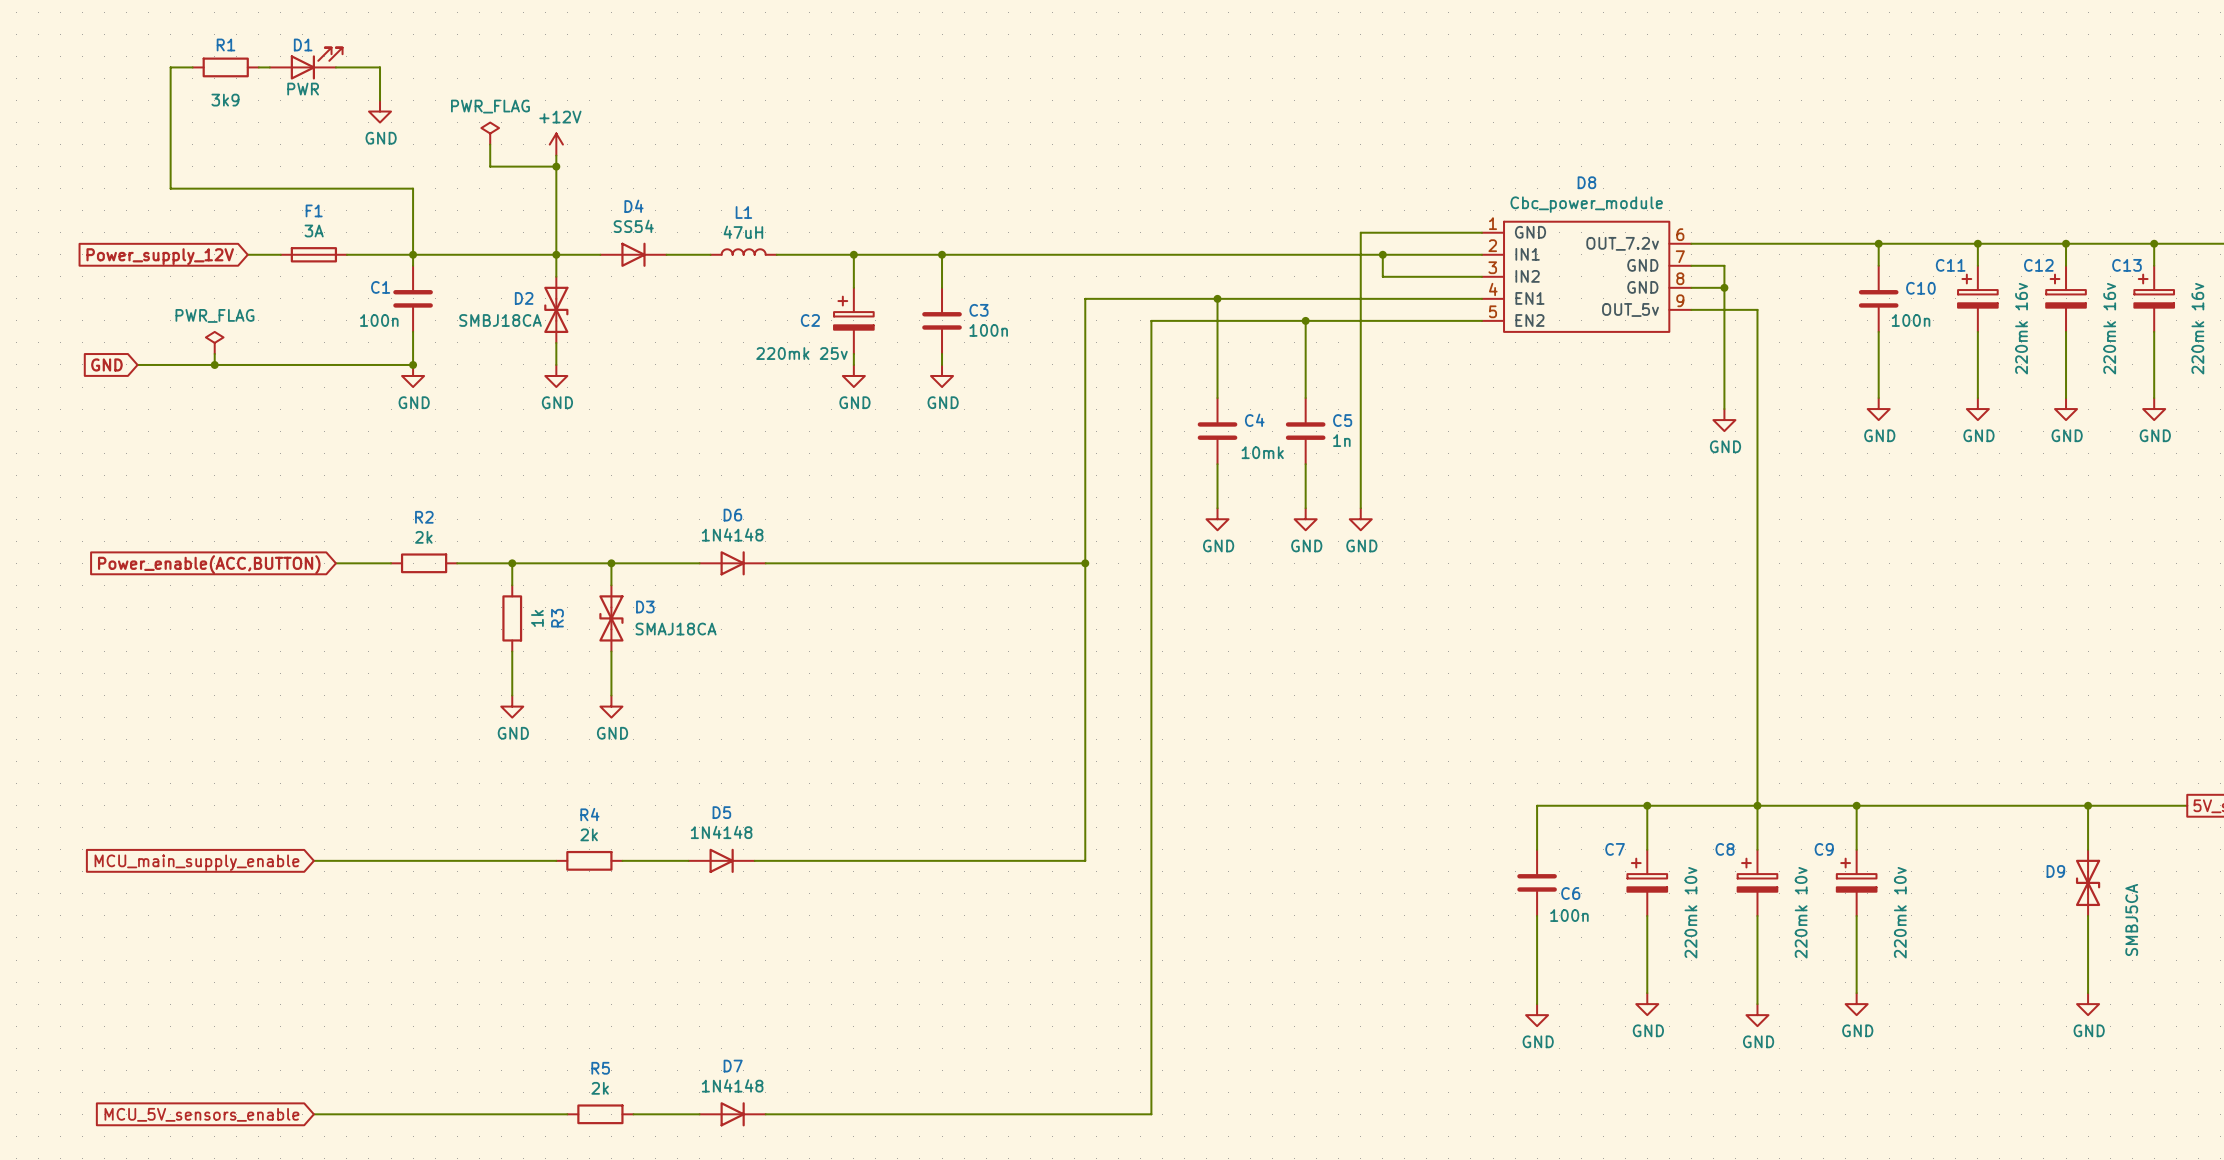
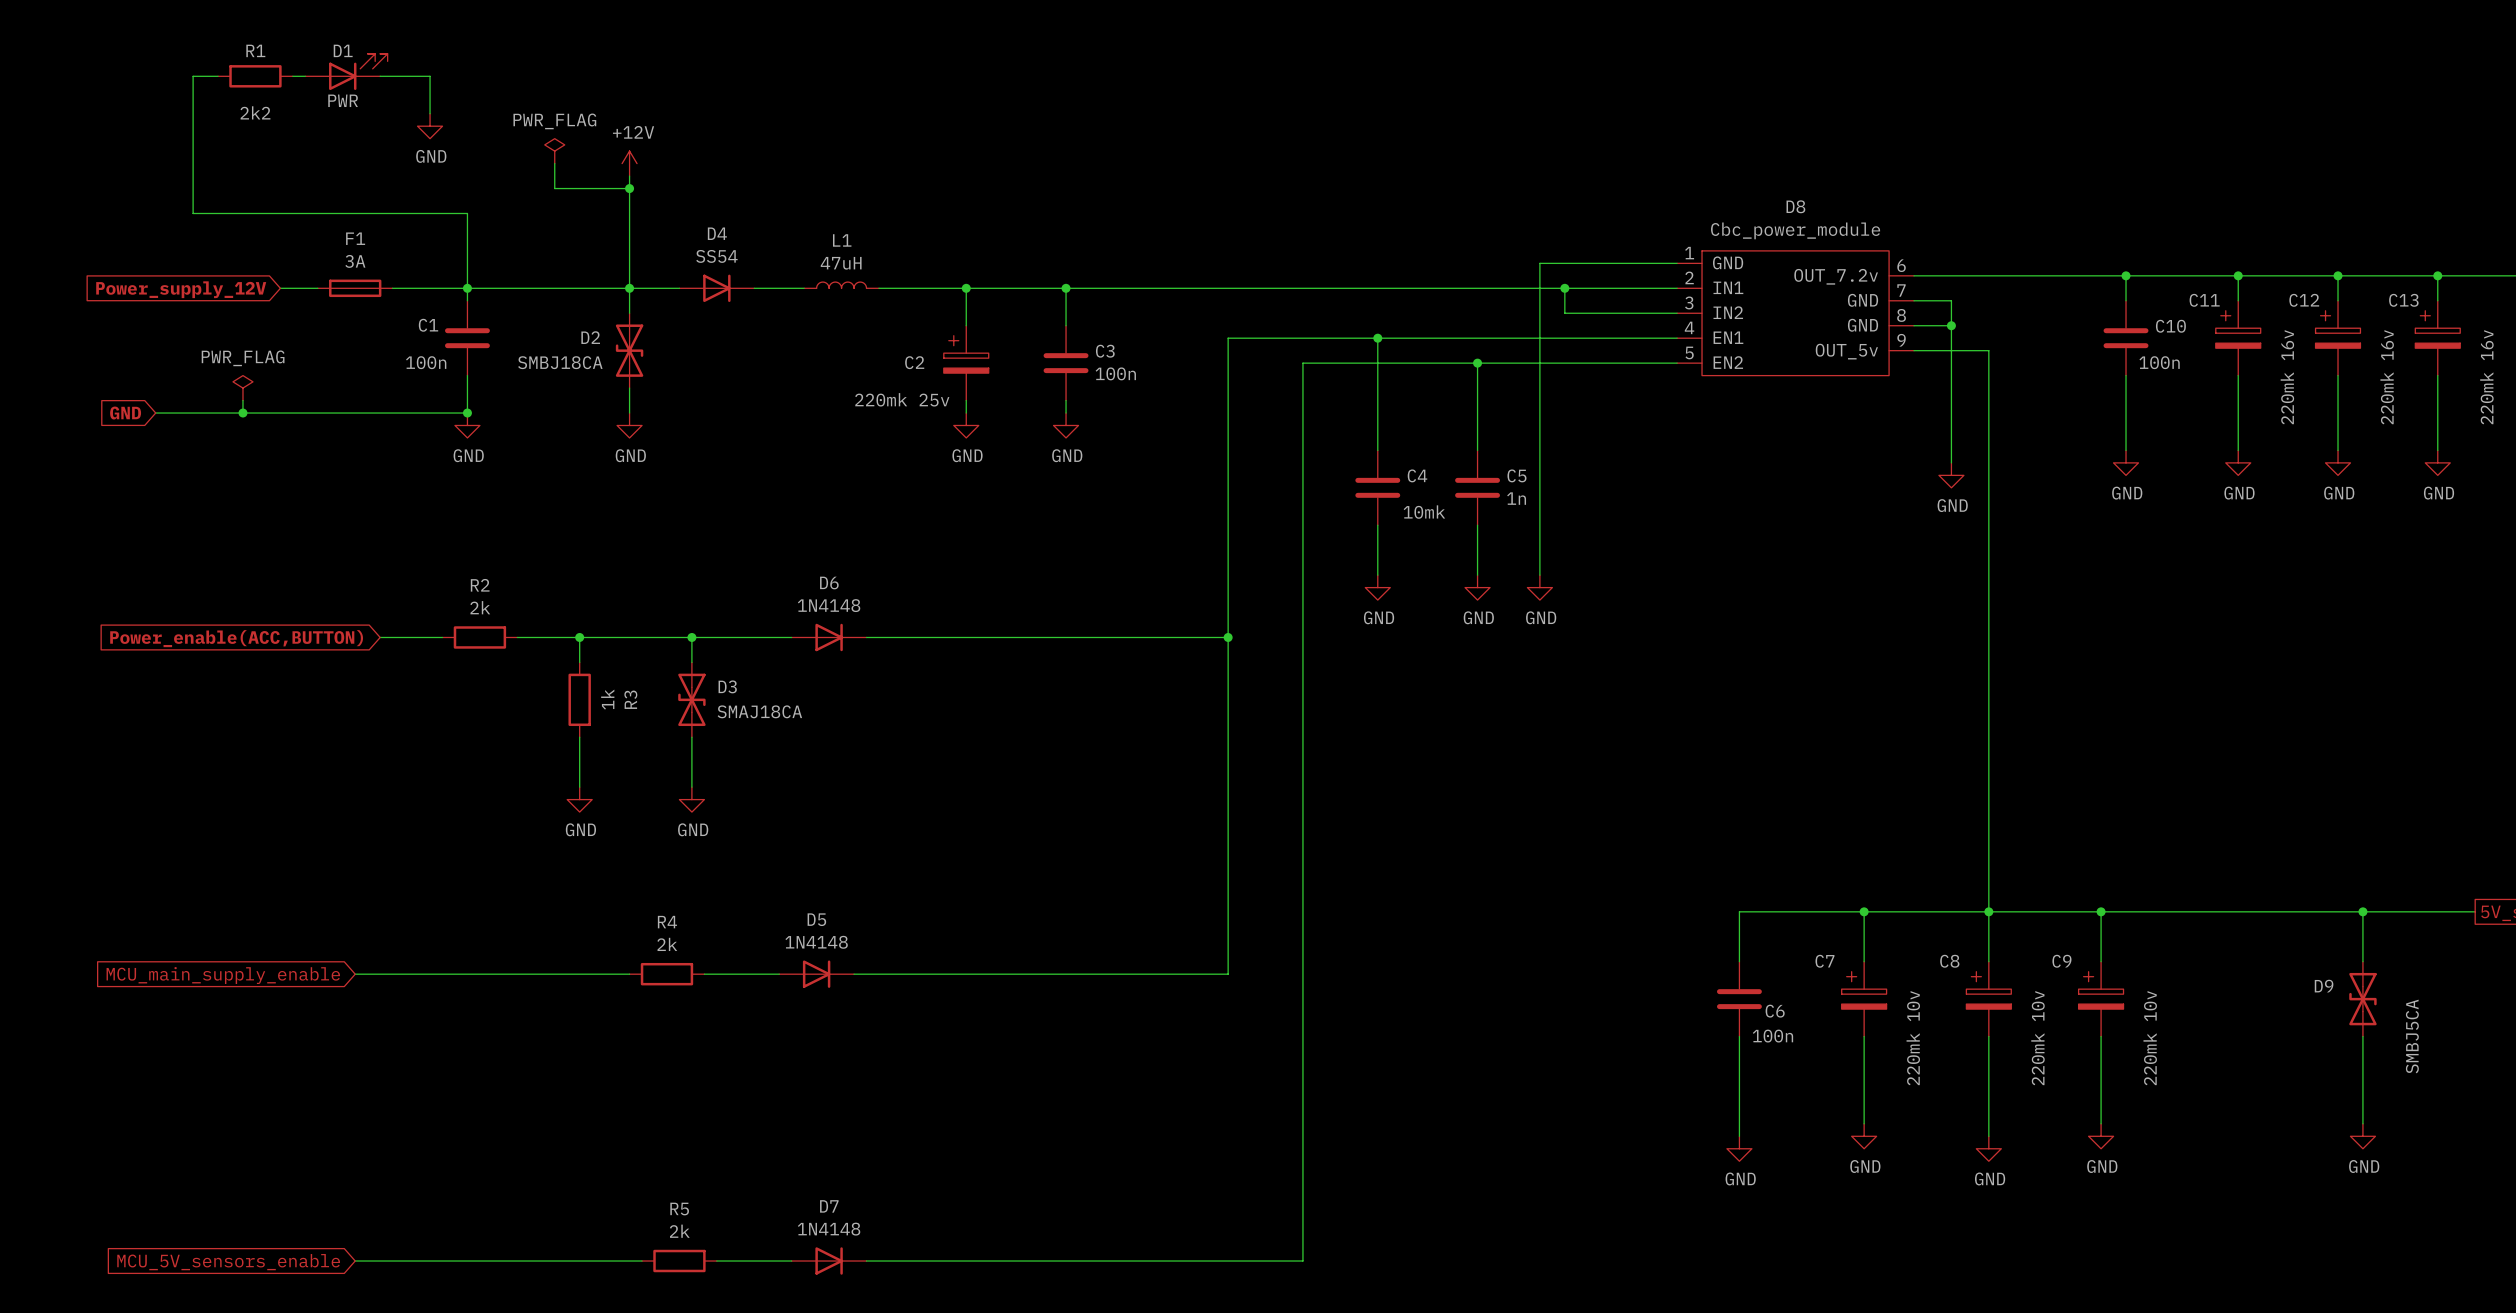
R1 value: 3k9 (225, 100) -> 2k2 (255, 112)

